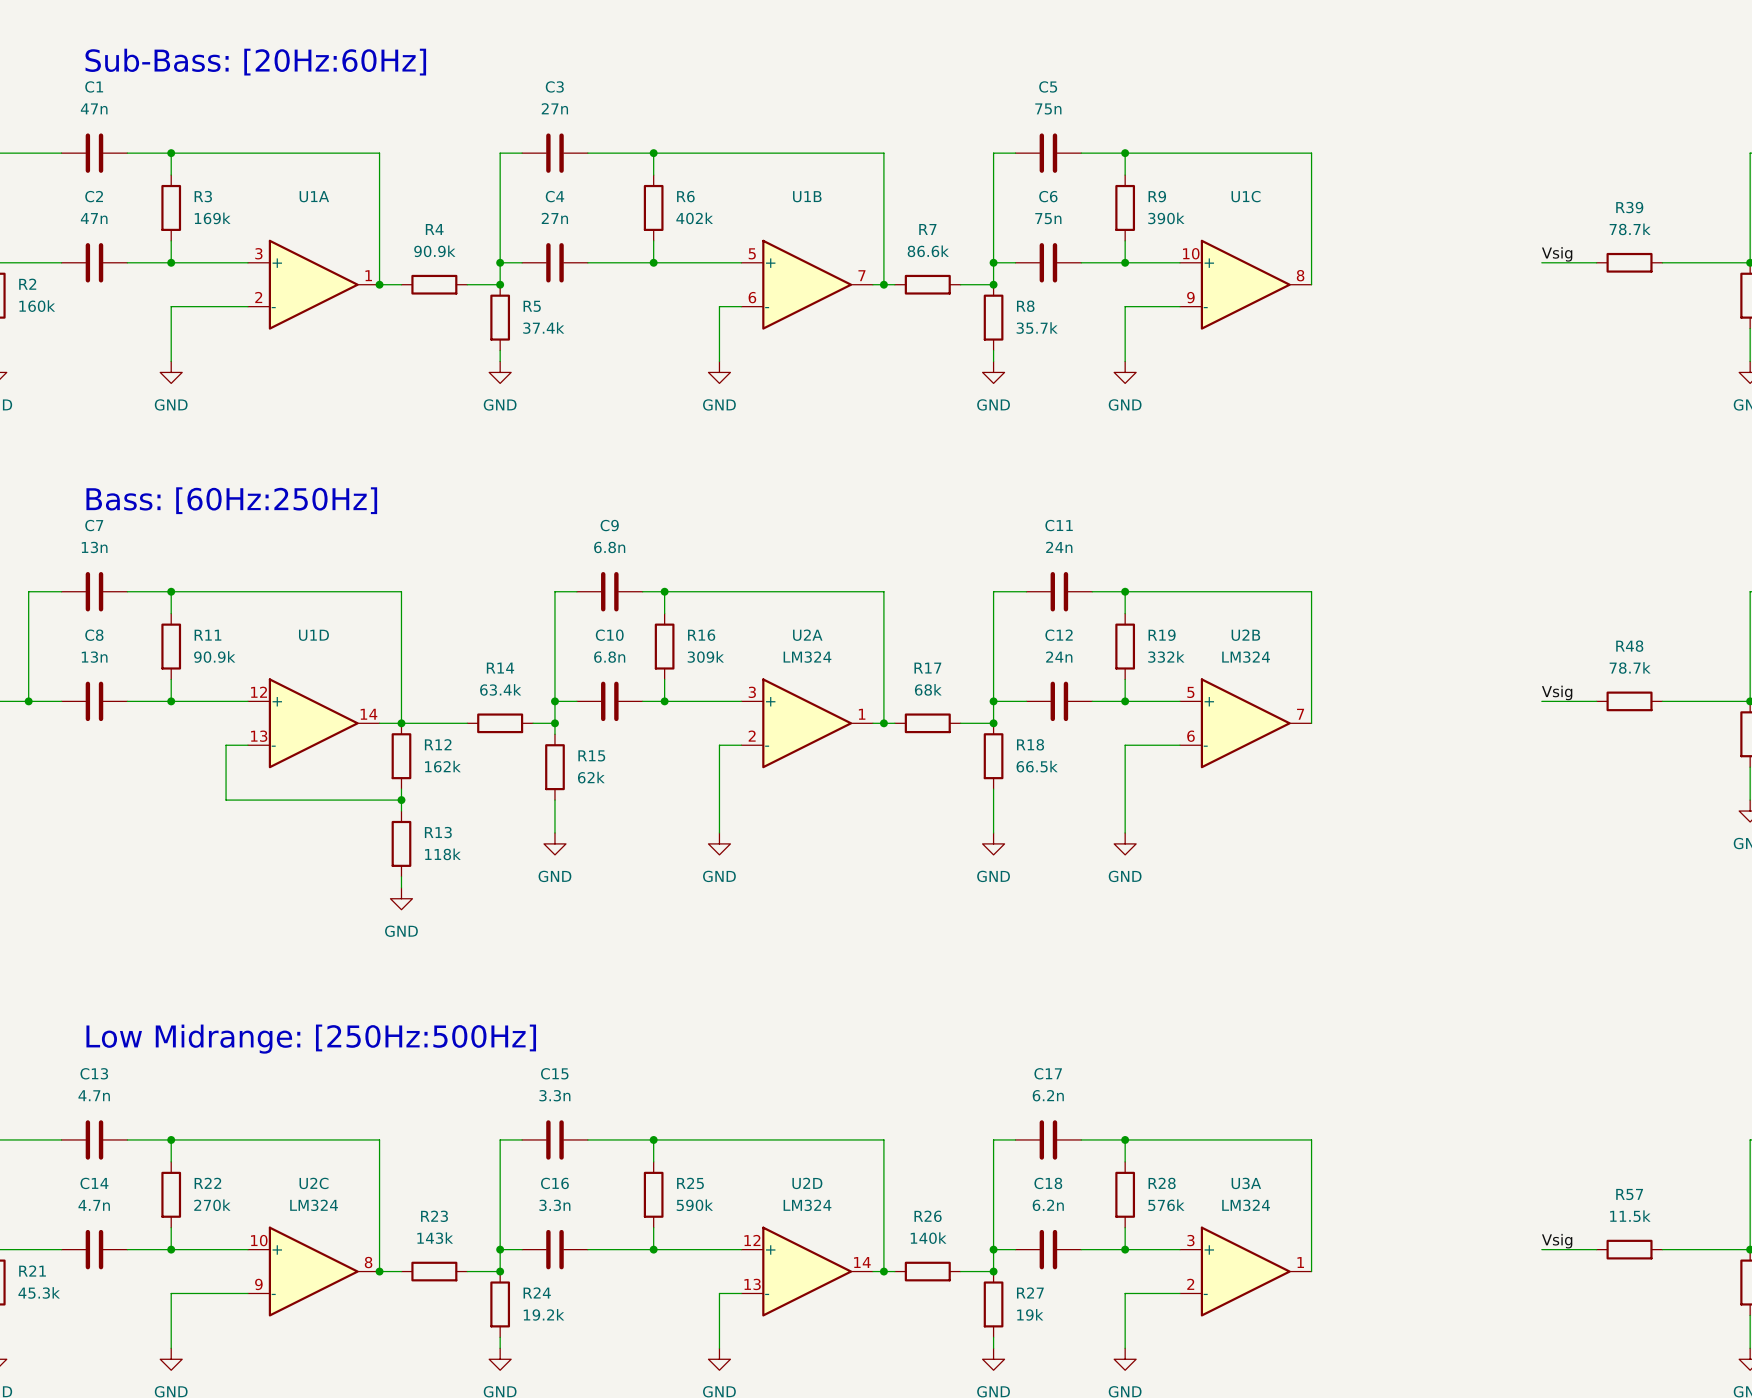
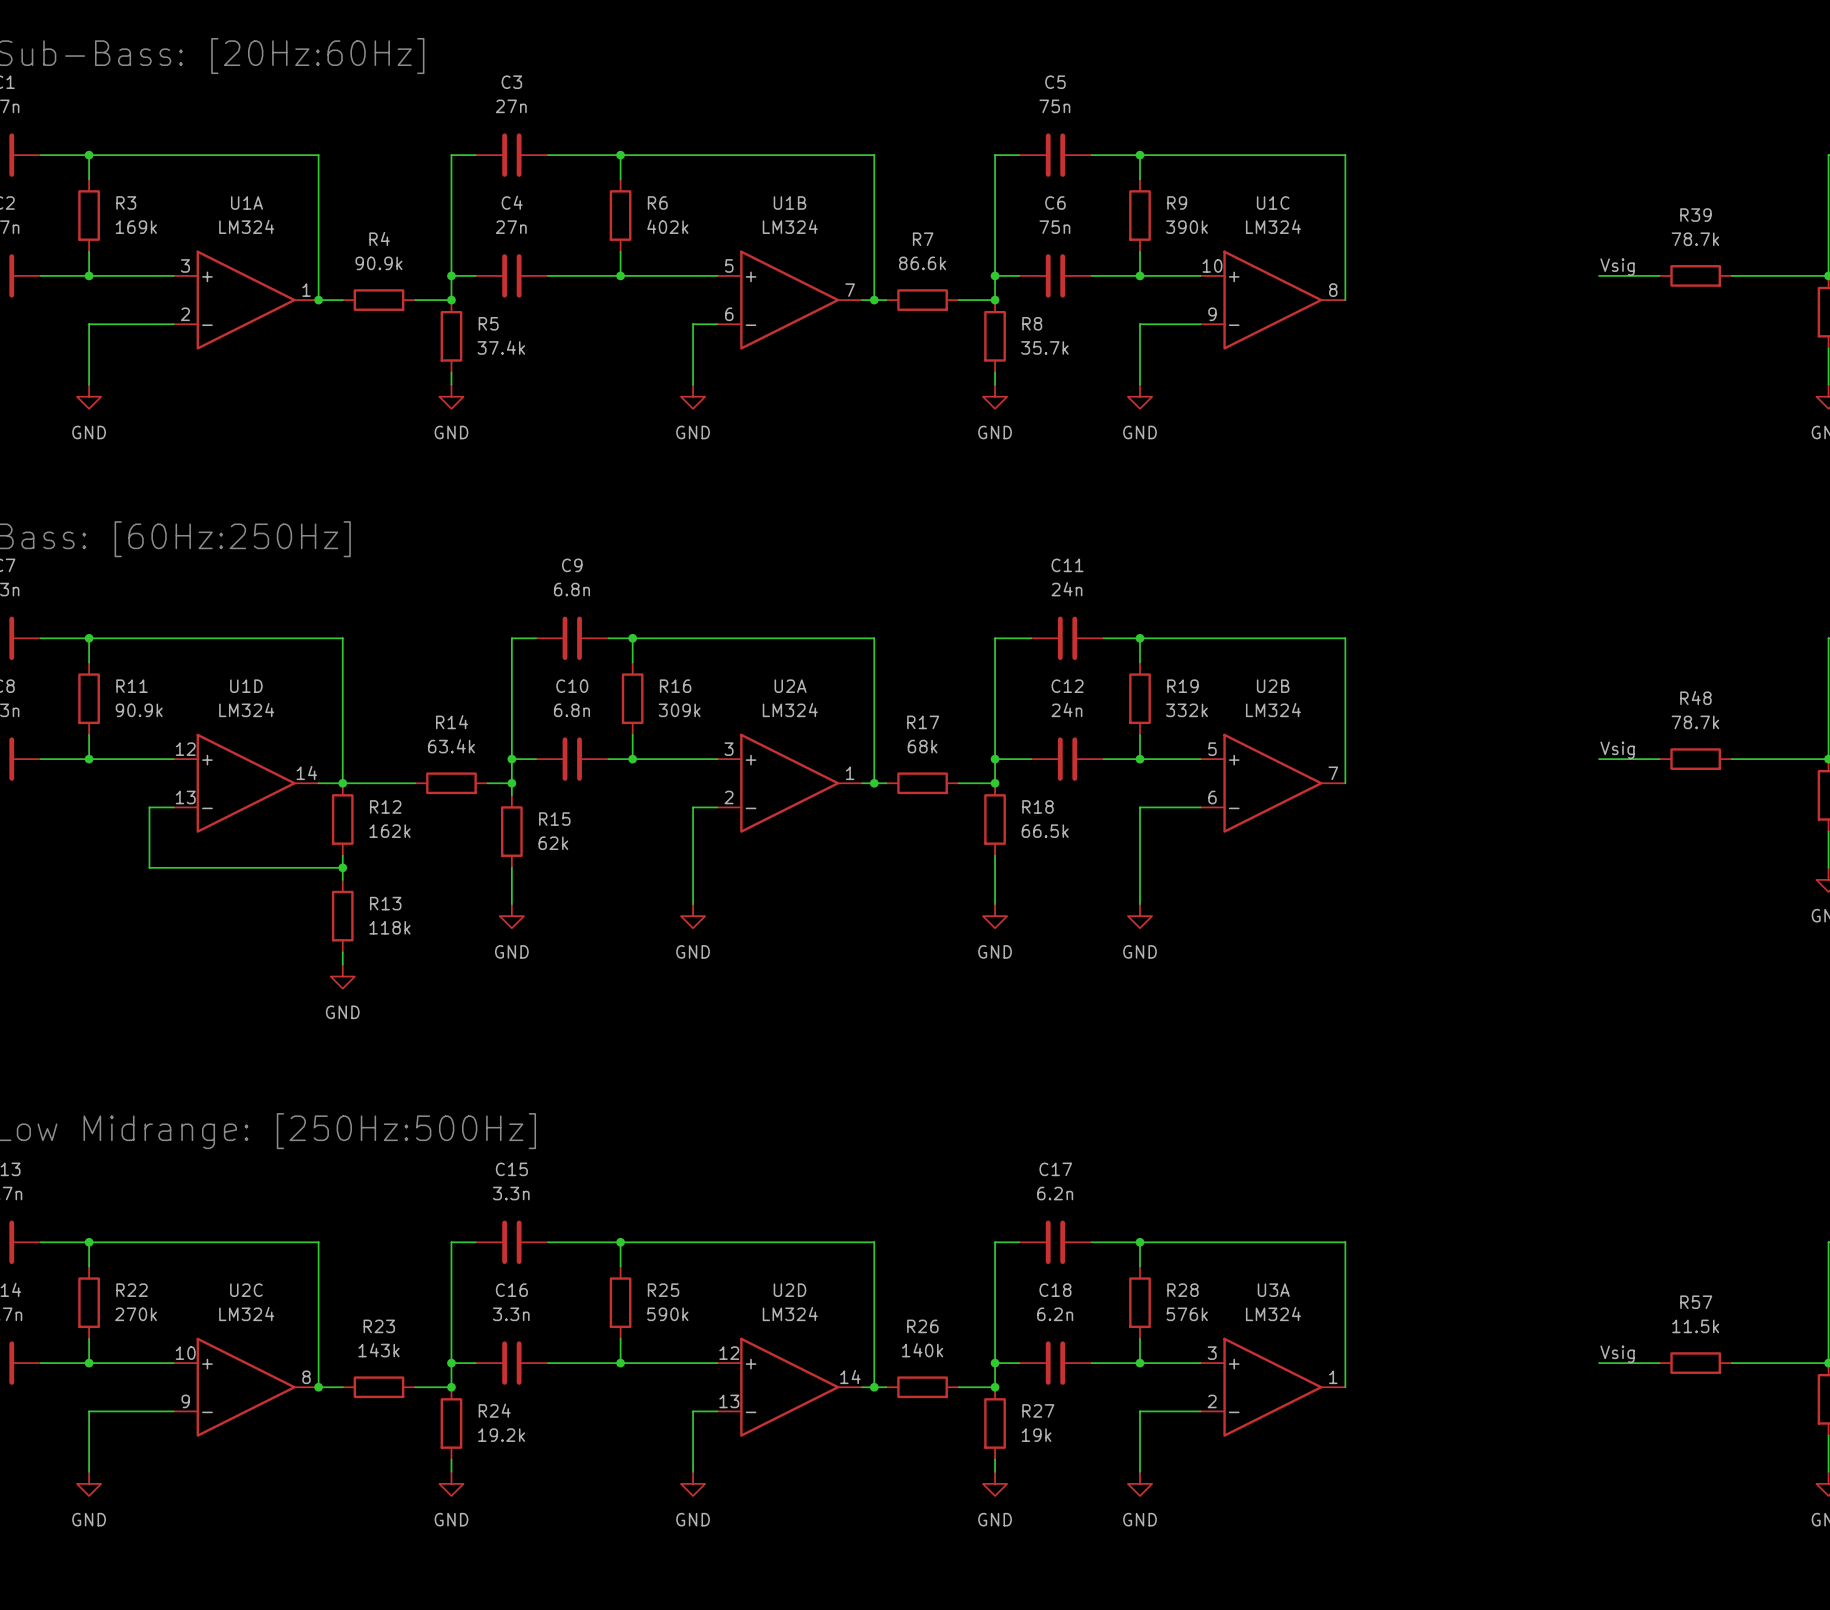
U1A value: none -> LM324 (246, 226)
U1B value: none -> LM324 (790, 226)
U1C value: none -> LM324 (1273, 226)
U1D value: none -> LM324 (246, 710)

